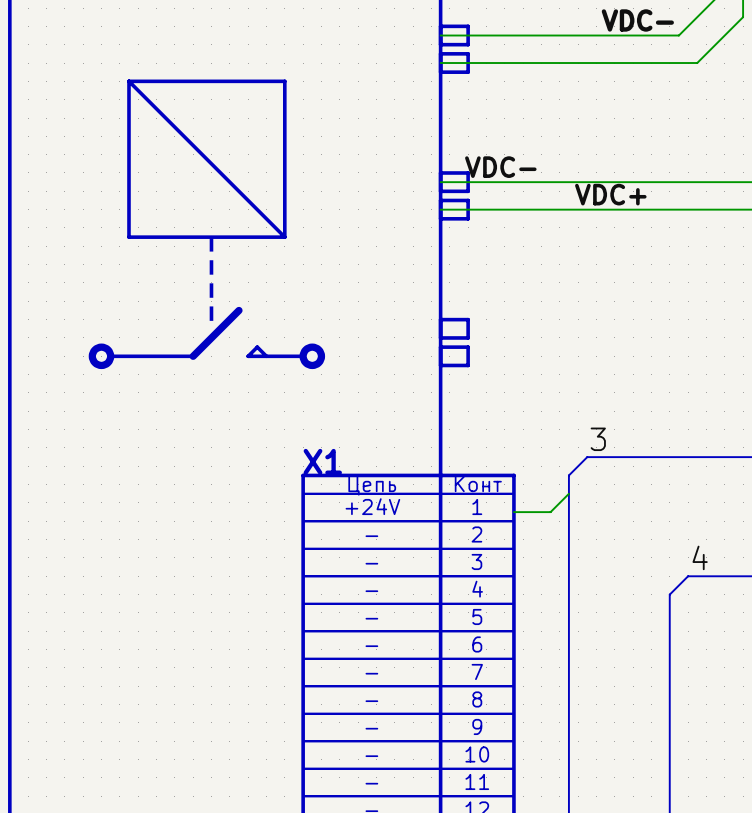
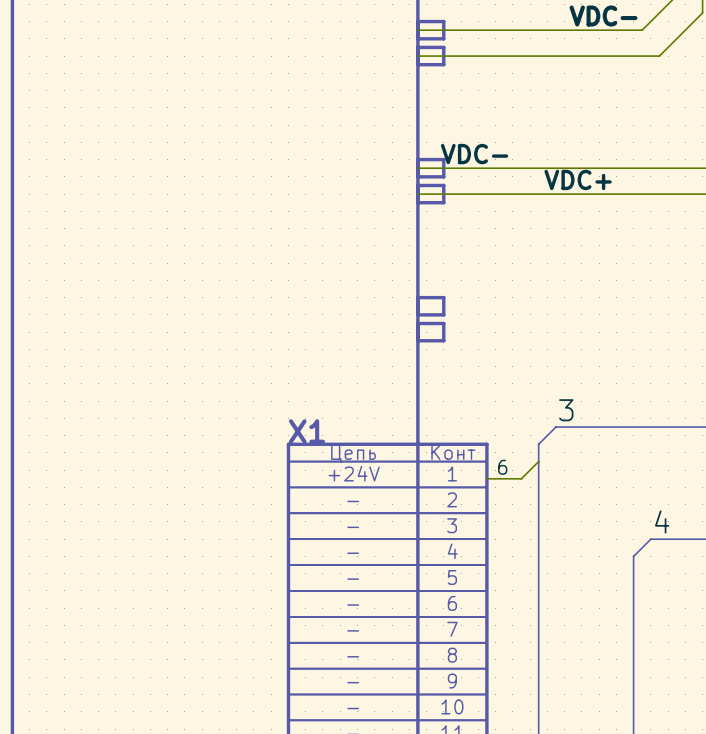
line: (128, 81) (284, 81) (284, 237) -> none
line: (128, 81) (128, 237) (284, 237) -> none
line: (128, 81) (284, 237) -> none
line: (211, 237) (211, 328) -> none
line: (238, 310) (193, 356) (110, 356) -> none
drawing: [88, 343, 115, 370] -> none
drawing: [299, 343, 326, 370] -> none
line: (266, 356) (257, 347) (248, 356) (303, 356) -> none
label: none -> 6 (502, 467)

